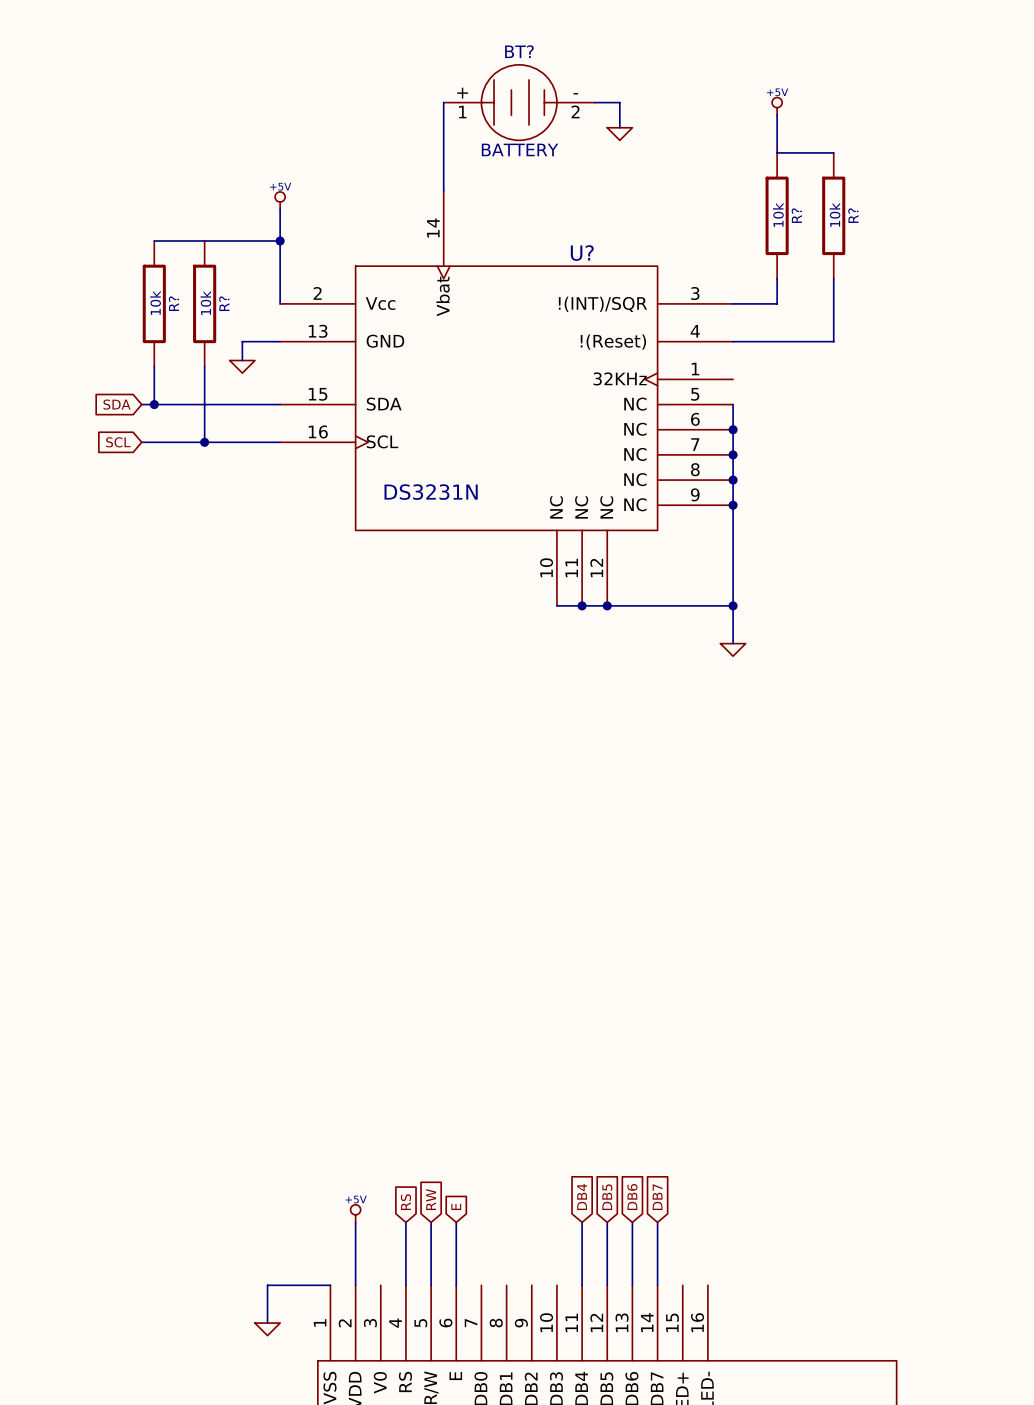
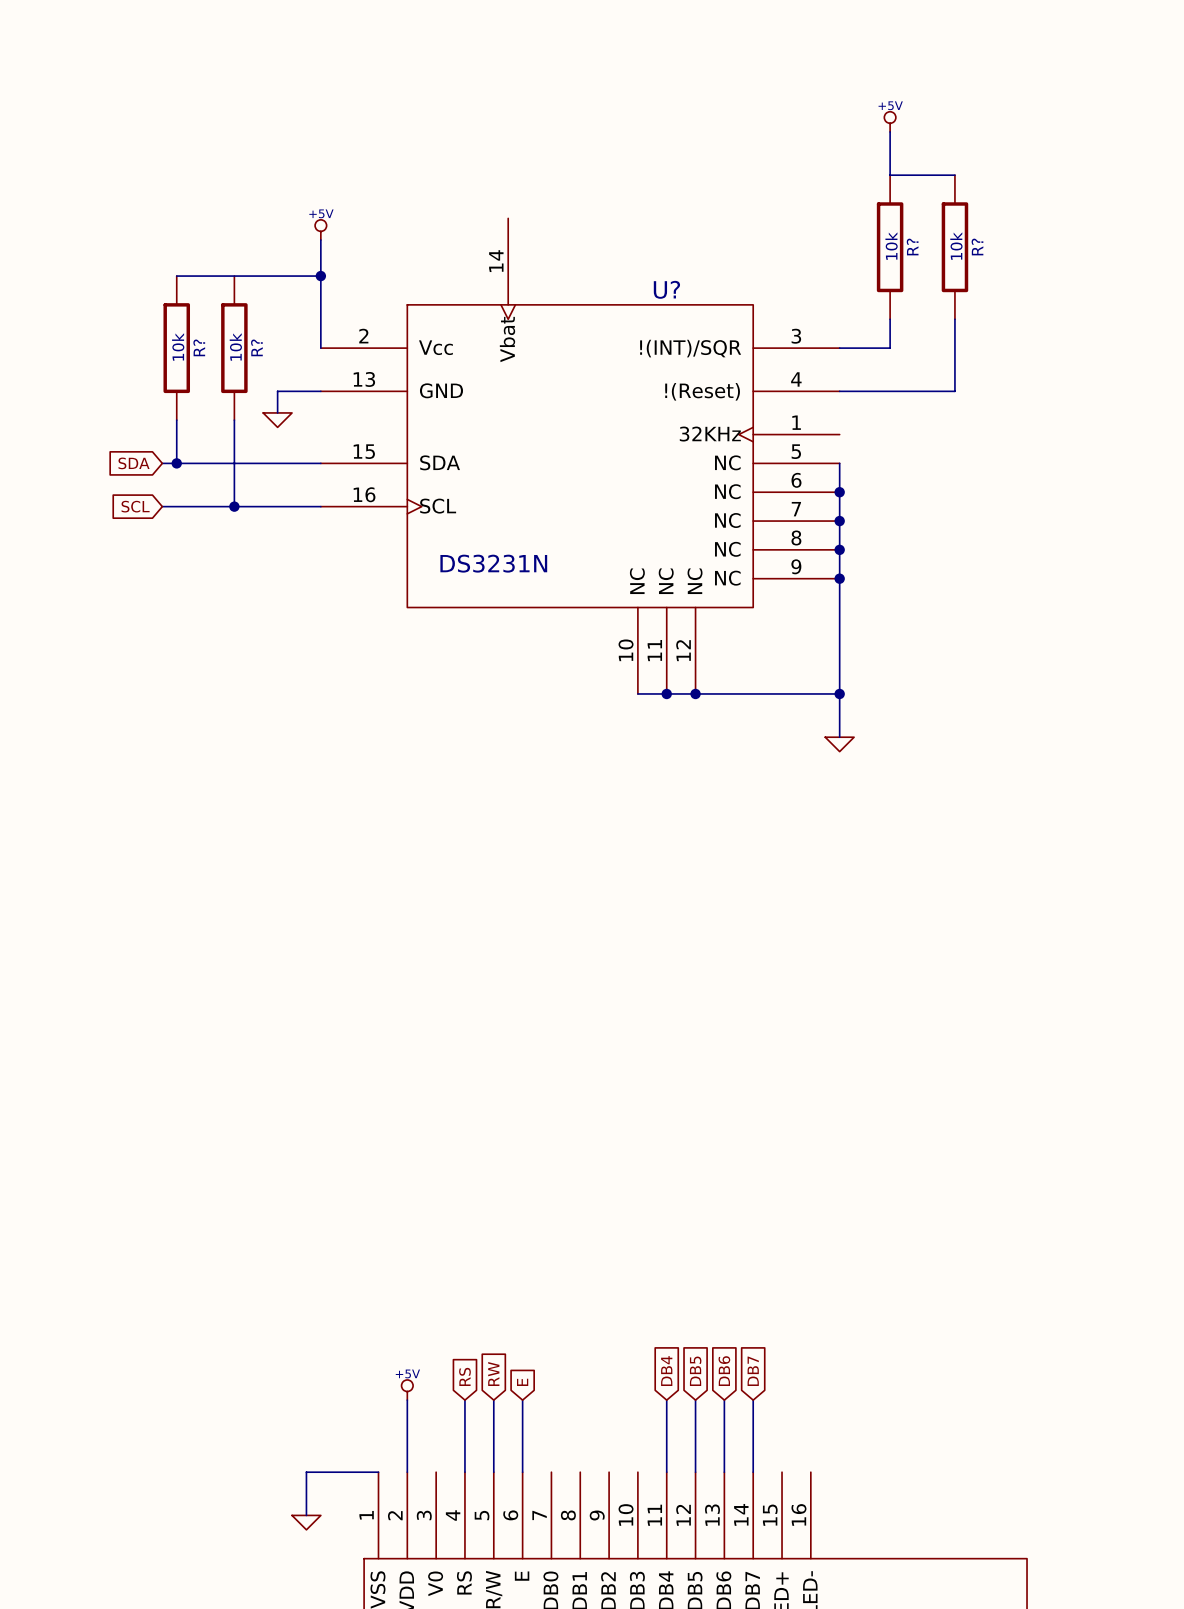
wire: (443, 102) (443, 190) -> none
BT?: BATTERY (519, 102) -> none
wire: (594, 102) (619, 102) (619, 127) -> none
power symbol: (619, 134) -> none

